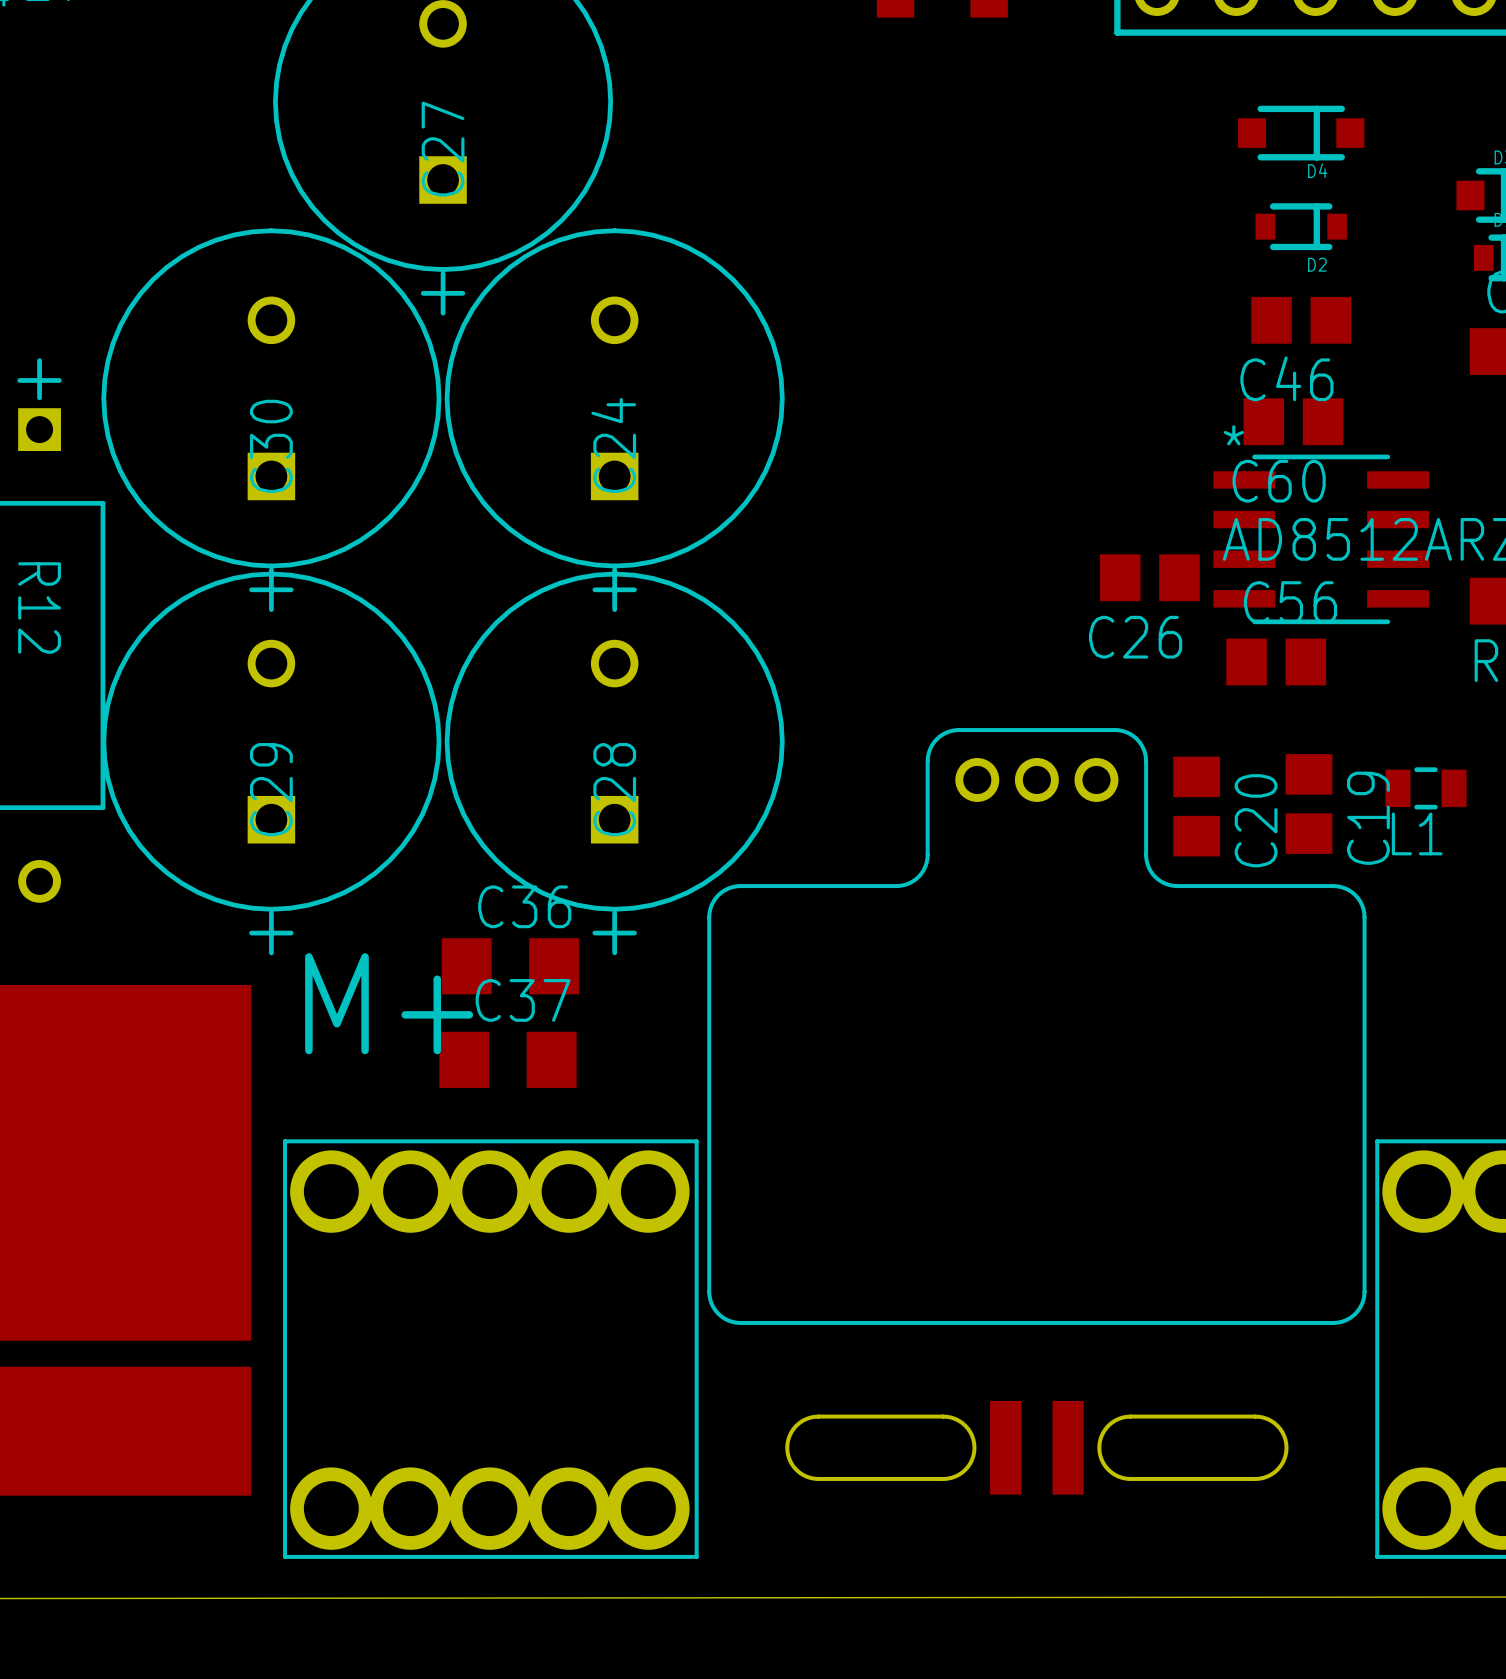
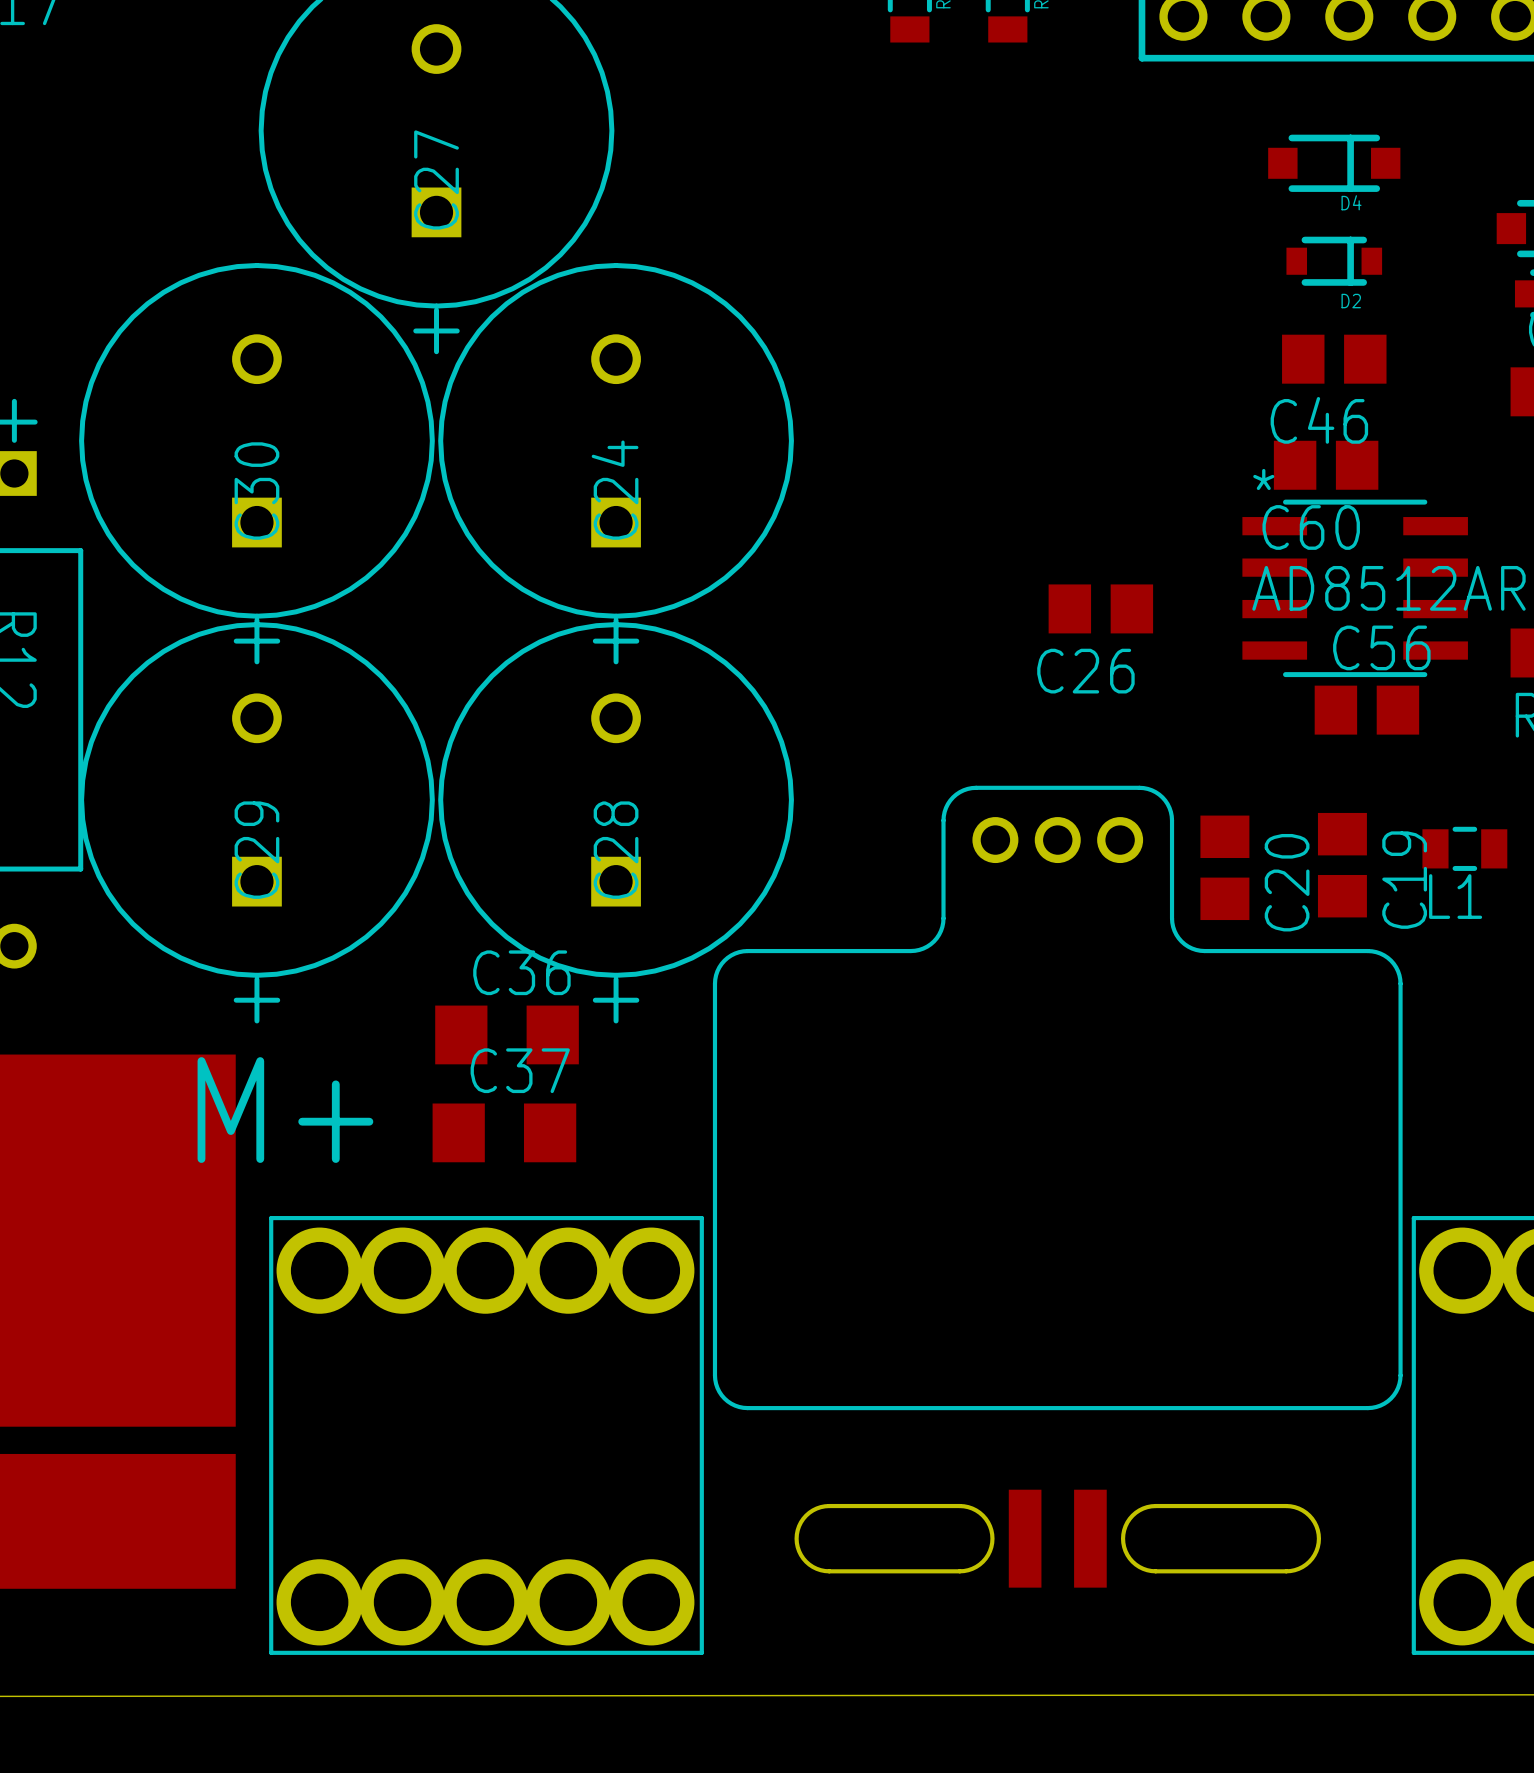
C26 position: (1149, 577) -> (1100, 608)
C56 position: (1276, 662) -> (1366, 710)
text position: M+ (389, 1003) -> M+ (285, 1110)

